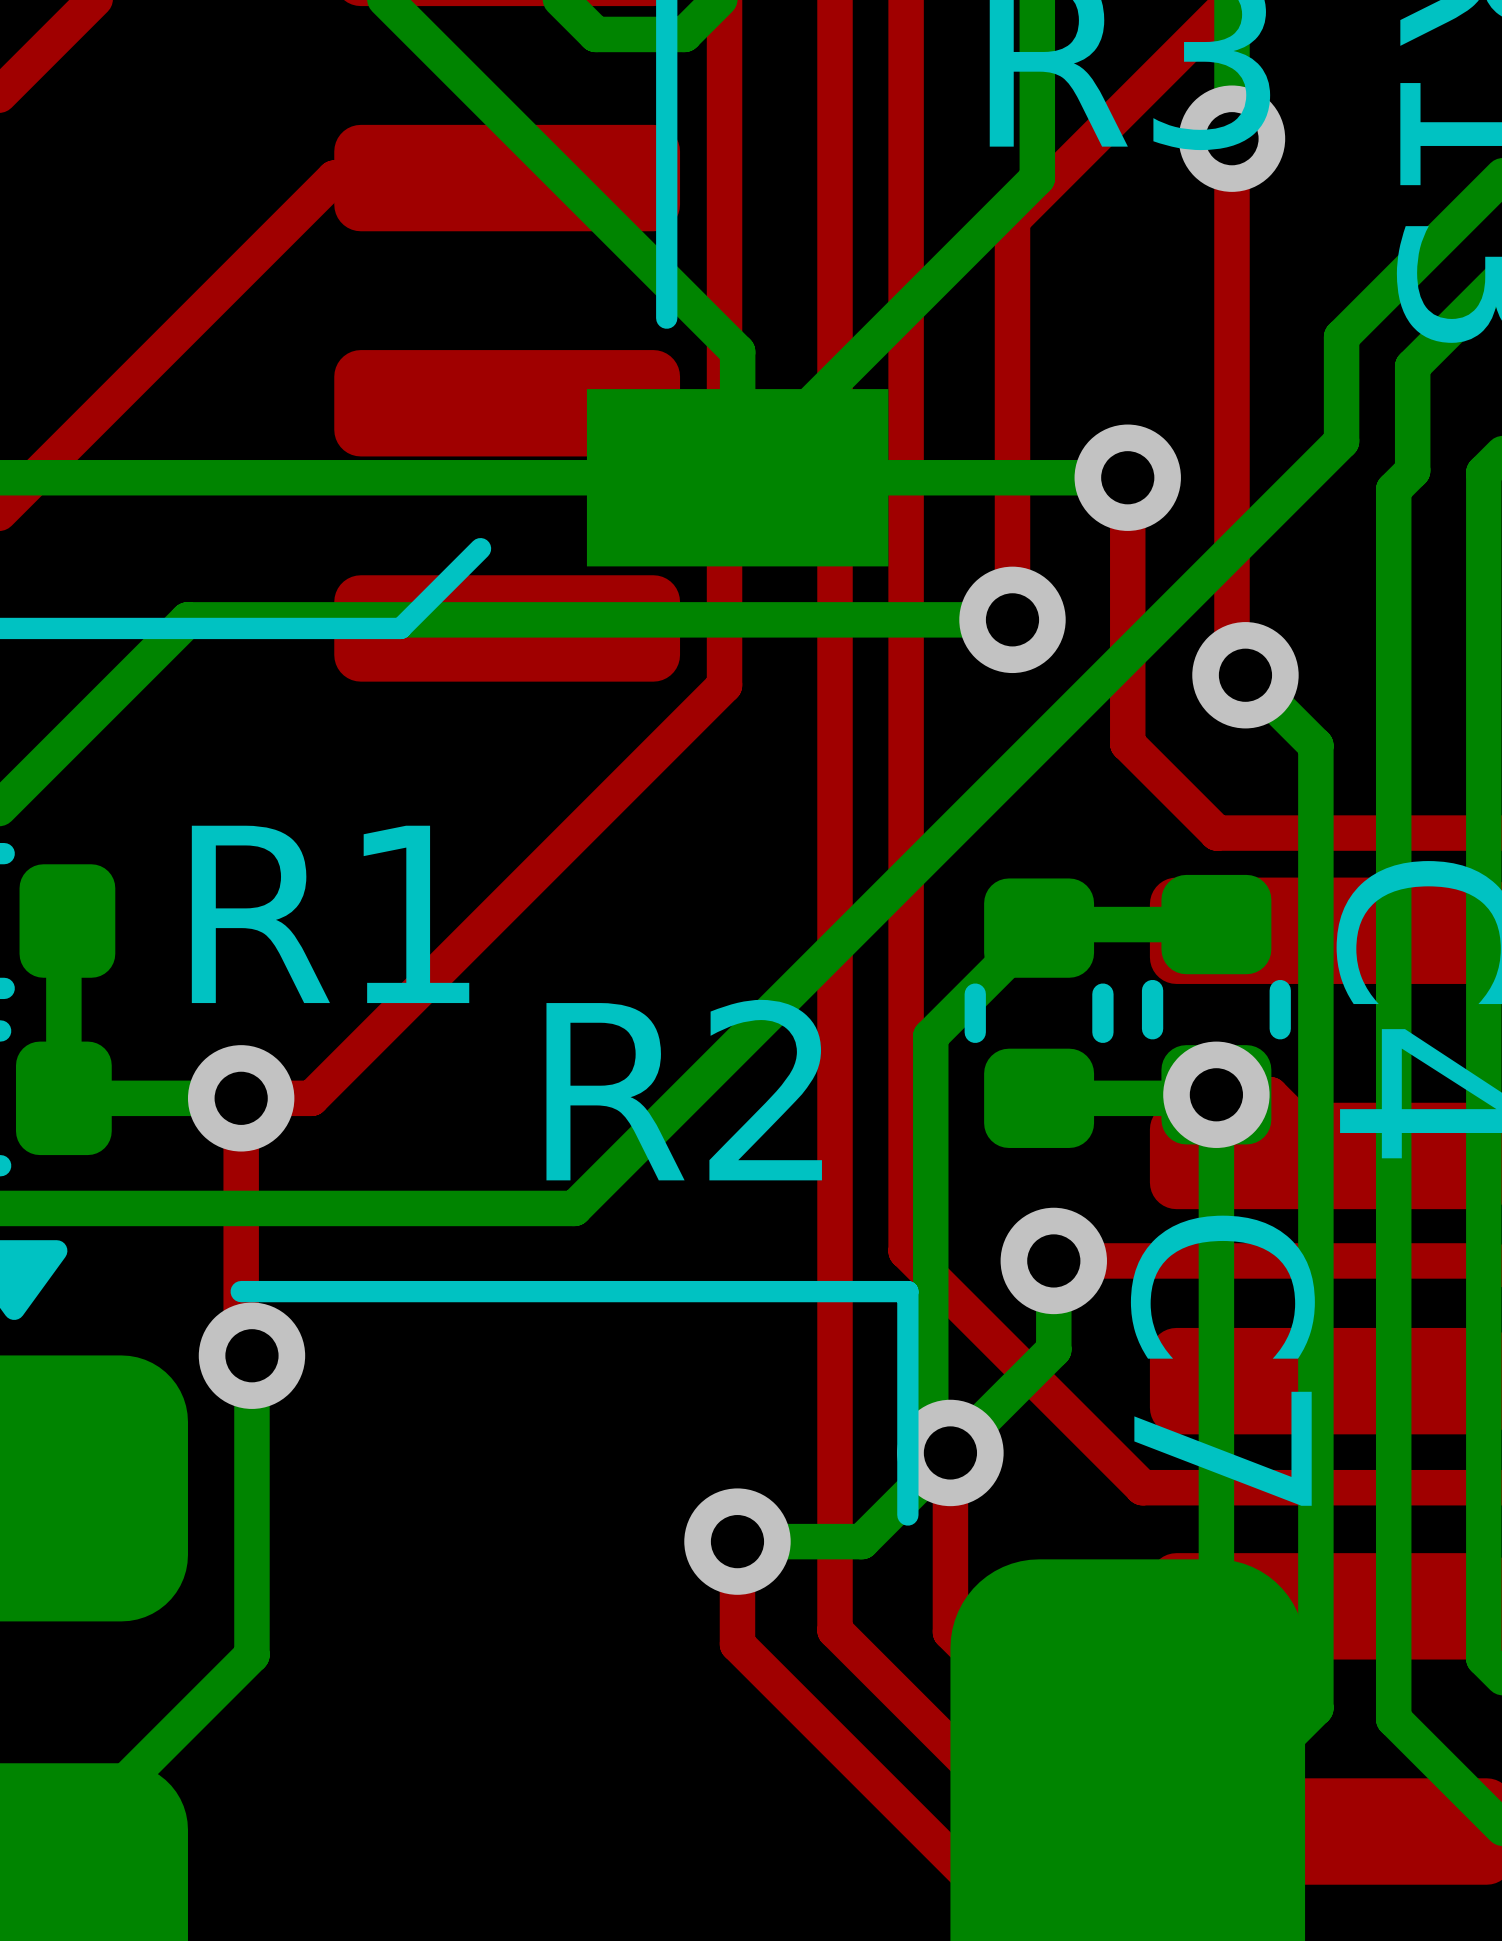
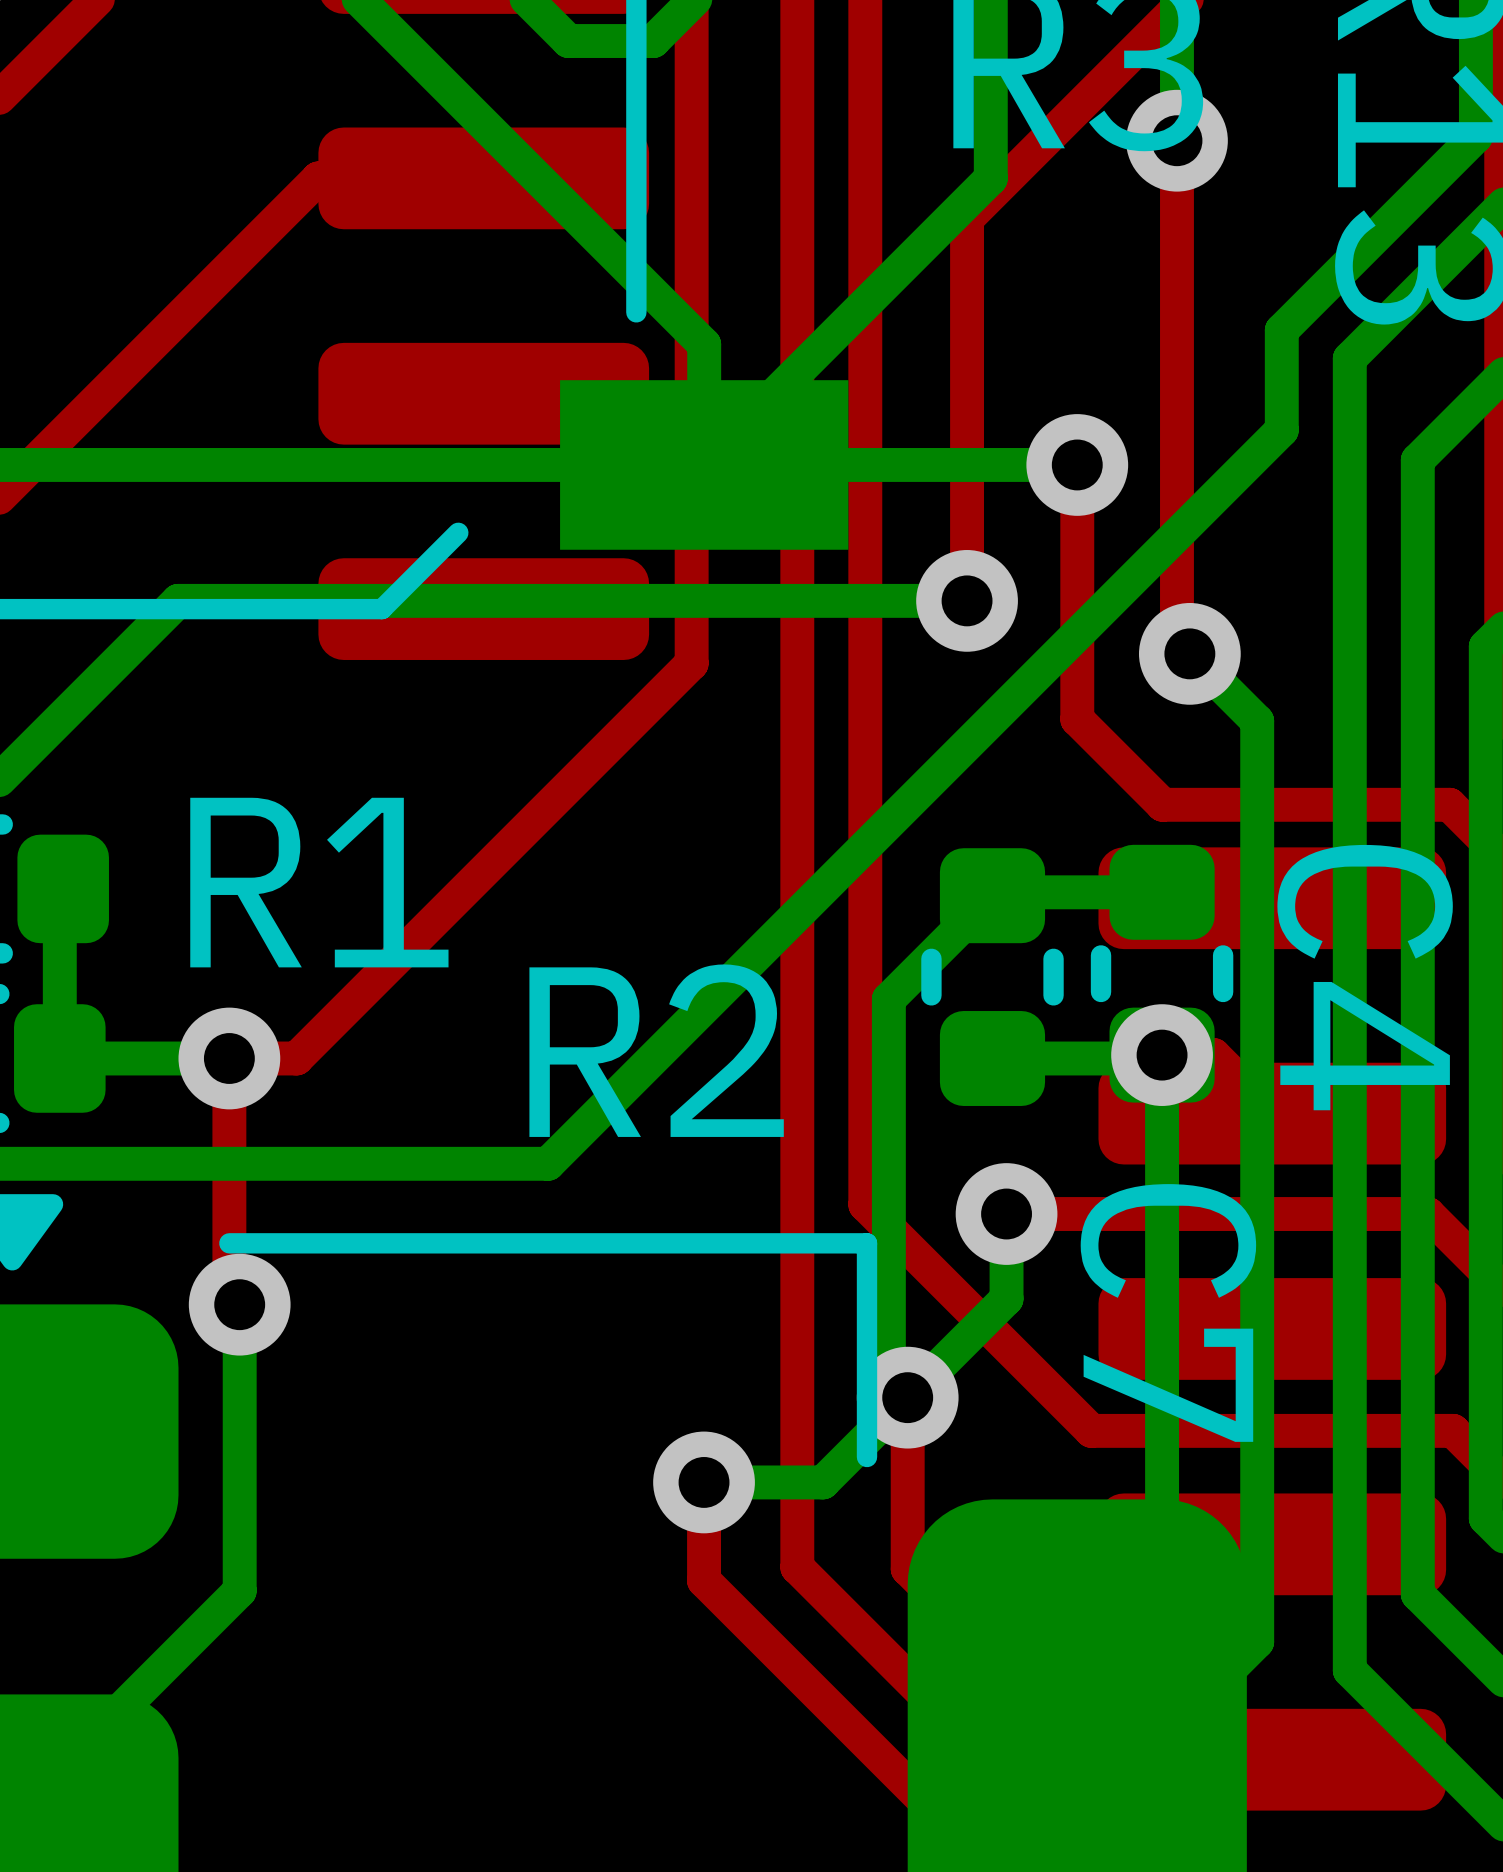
bottom track: (1412, 470) (1393, 489) (1393, 1719) (1412, 1738) -> (1349, 458) (1349, 1670)

